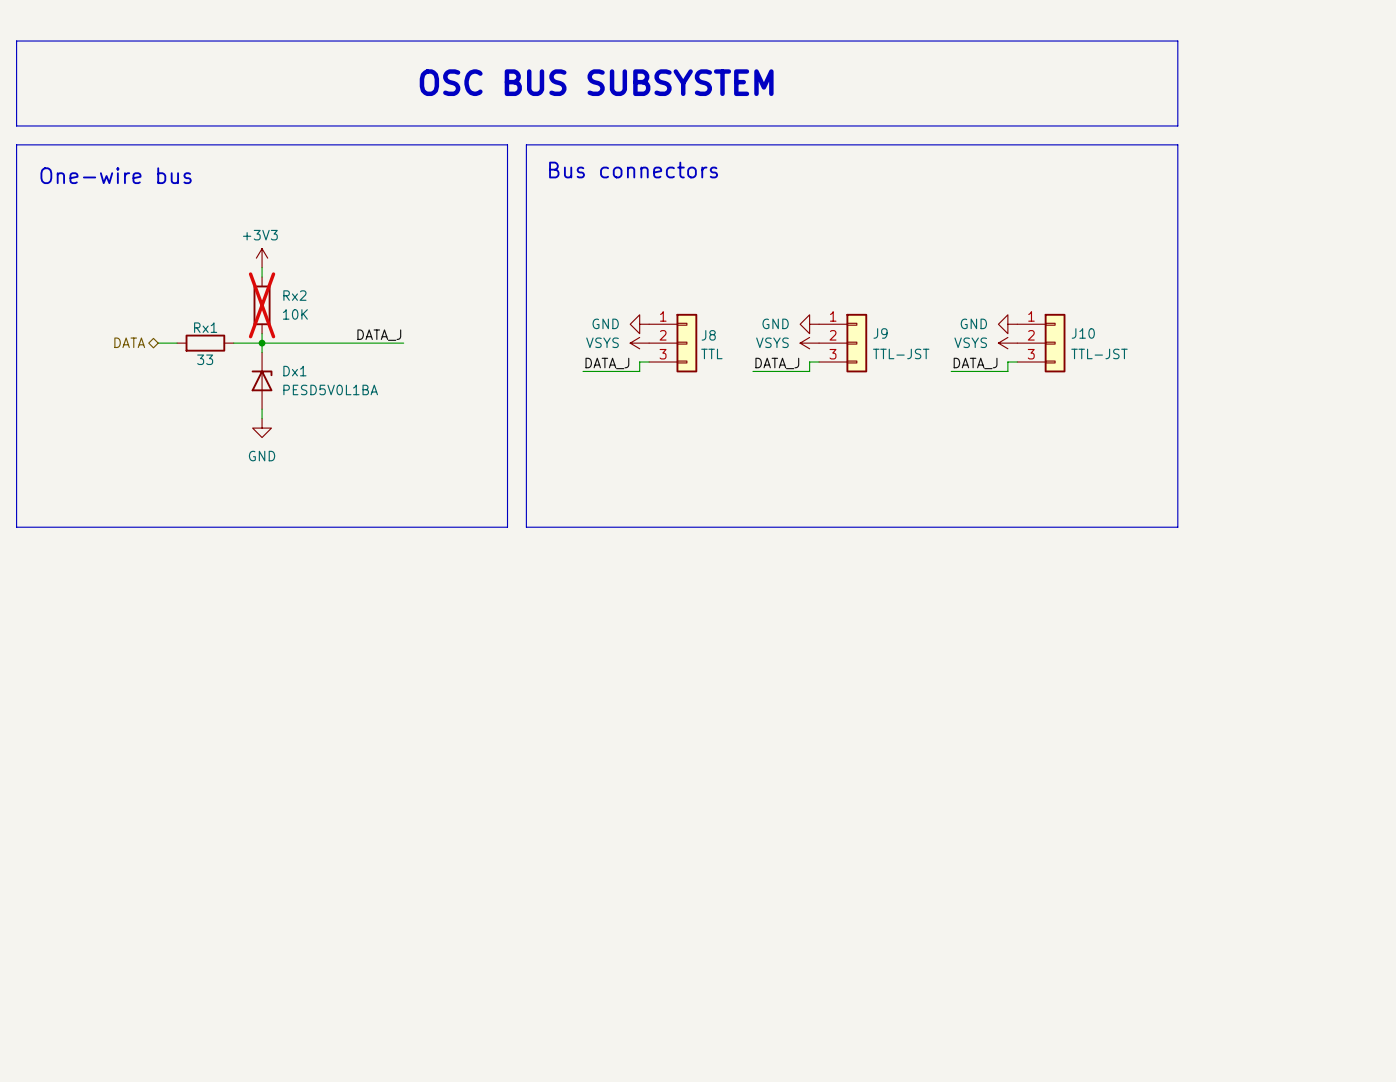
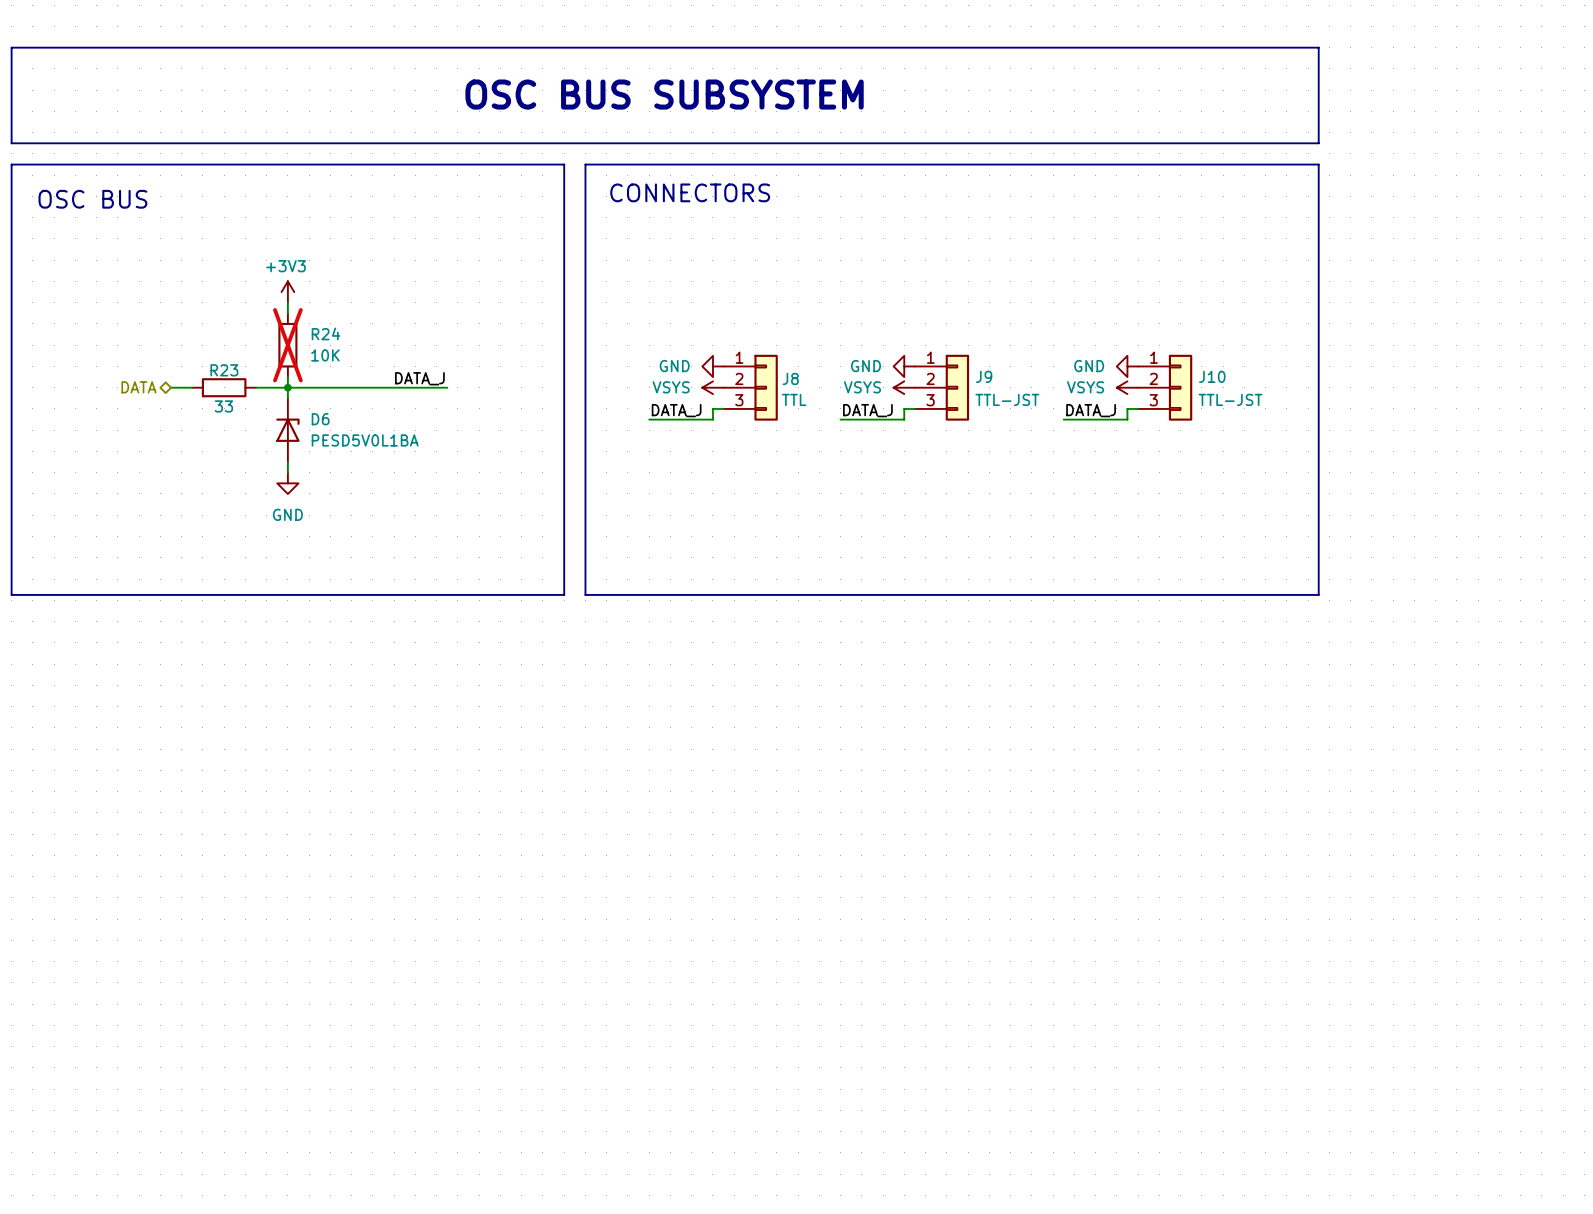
text: Bus connectors (633, 170) -> CONNECTORS (690, 192)
text: One-wire bus (116, 175) -> OSC BUS (92, 199)
Rx2 name: Rx2 (294, 295) -> R24 (325, 333)
Rx1 name: Rx1 (205, 327) -> R23 (224, 370)
Dx1 name: Dx1 (294, 371) -> D6 (320, 419)

